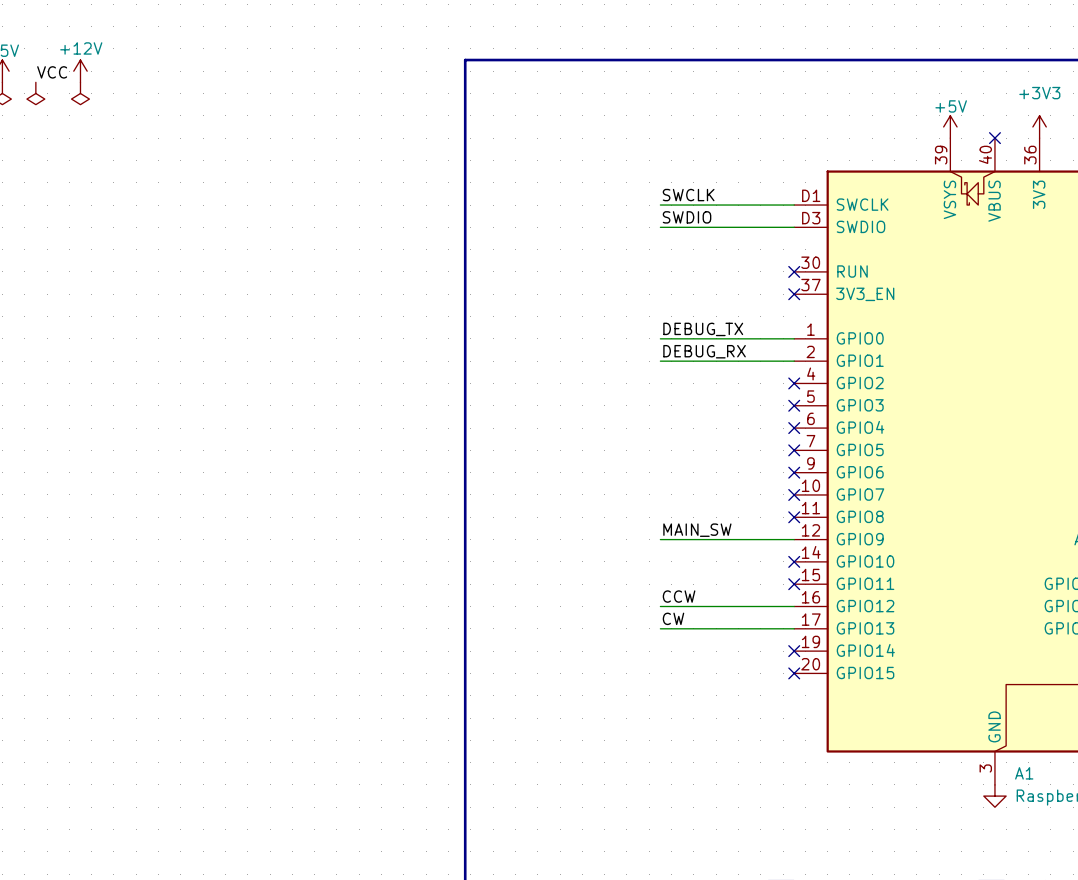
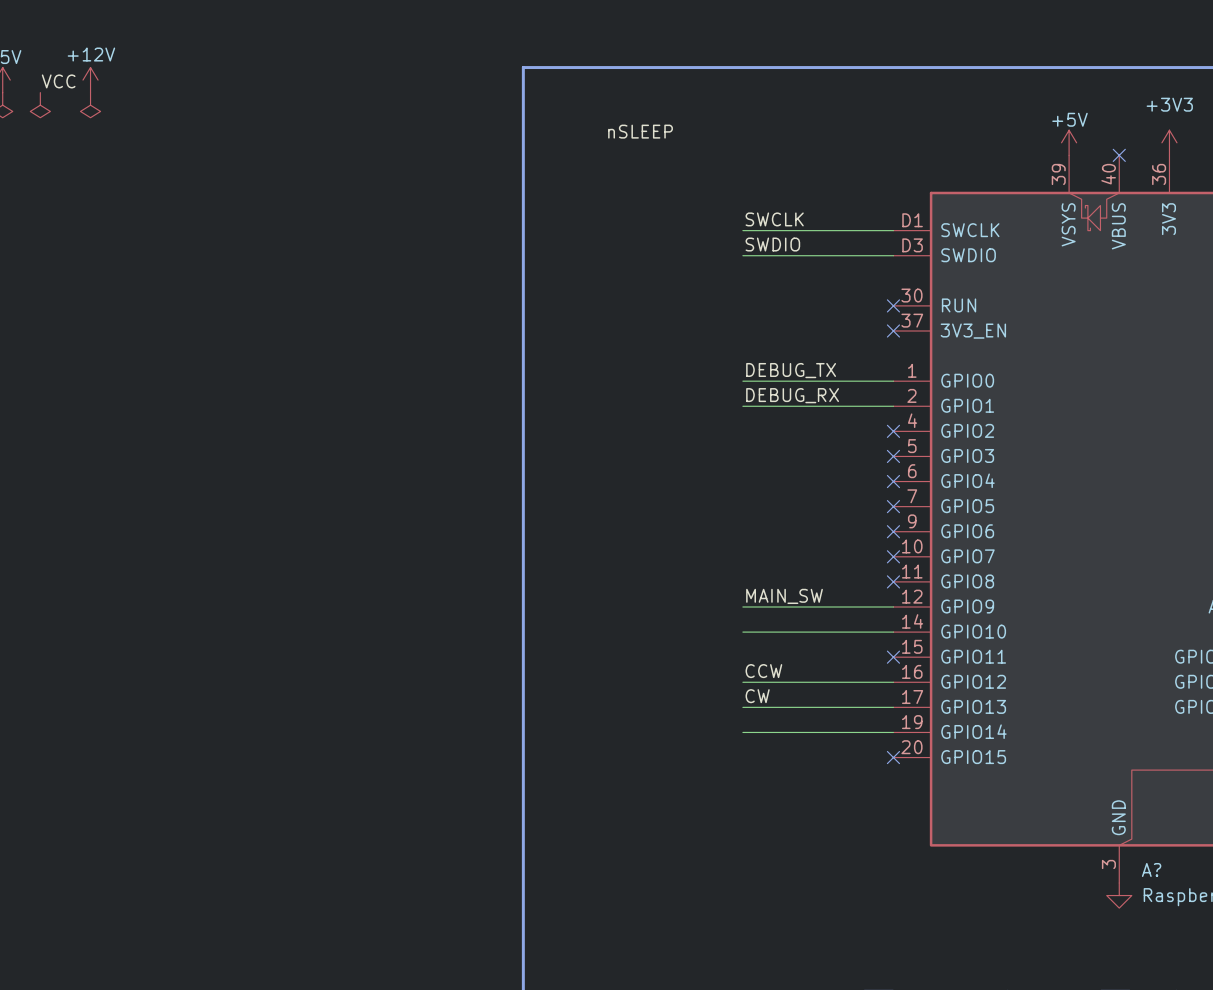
label: none -> nSLEEP (640, 131)
wire: none -> (742, 632) (893, 632)
no-connect mark: (794, 561) -> none
wire: none -> (742, 732) (893, 732)
no-connect mark: (794, 651) -> none
A1 name: A1 (1024, 773) -> A? (1151, 869)

